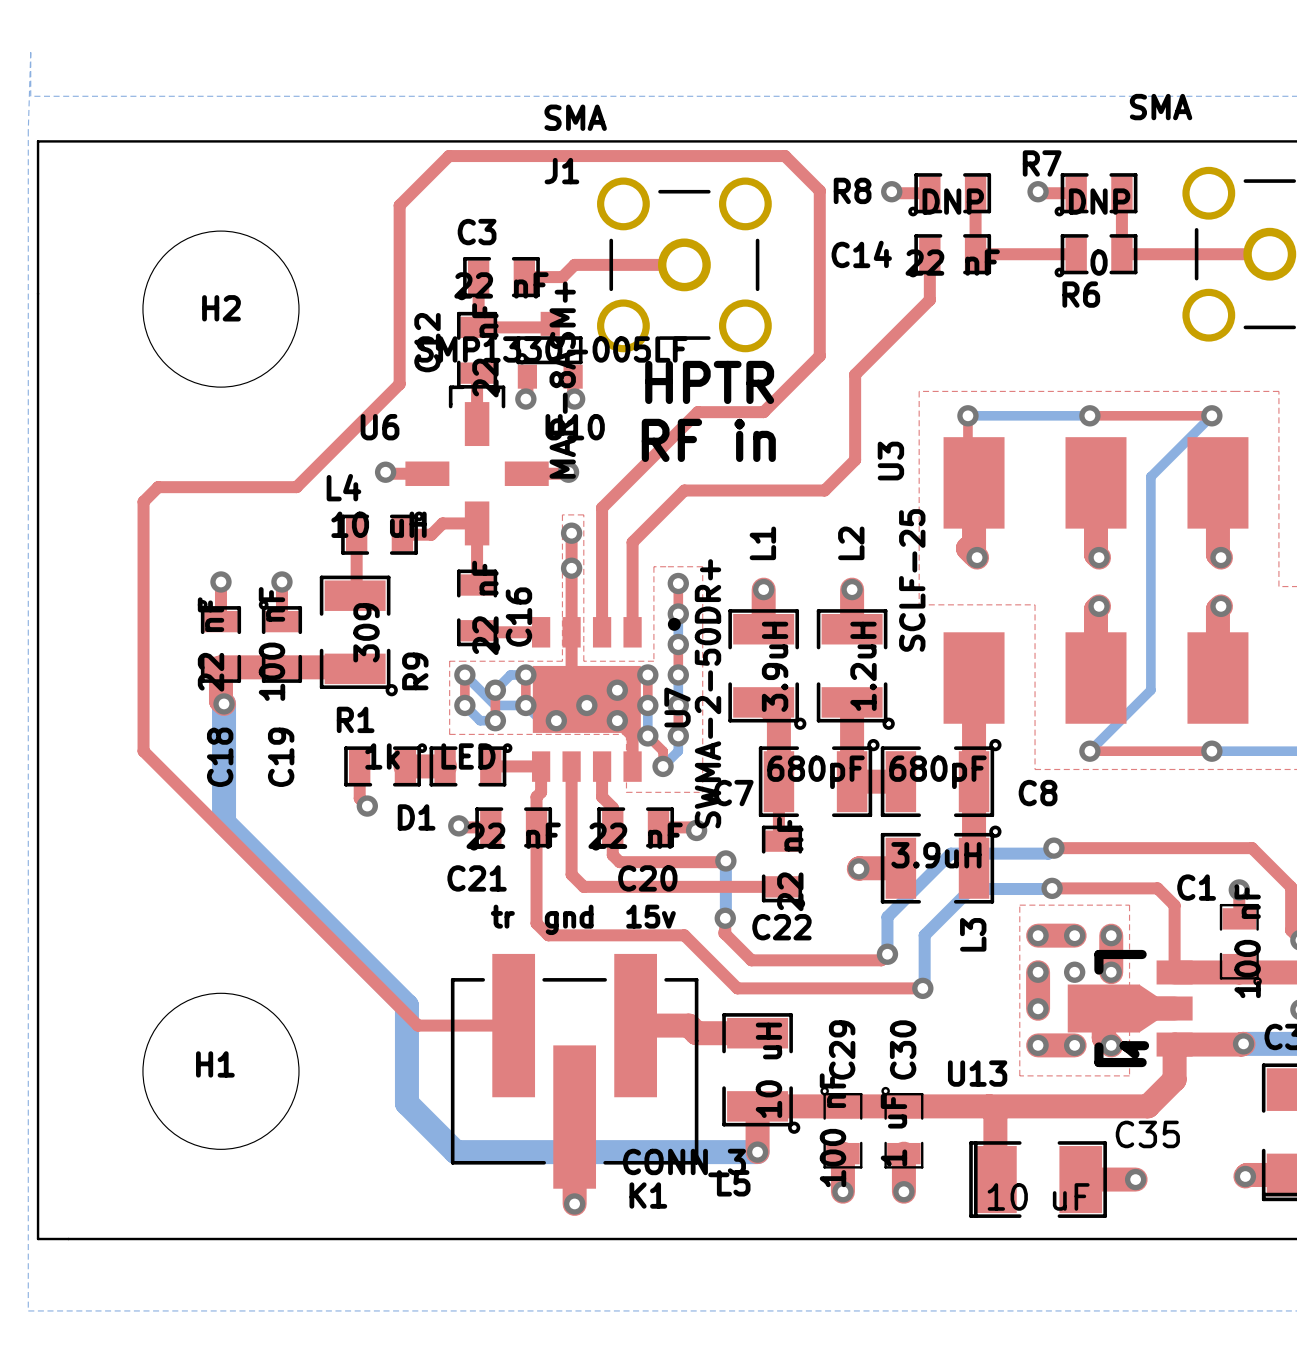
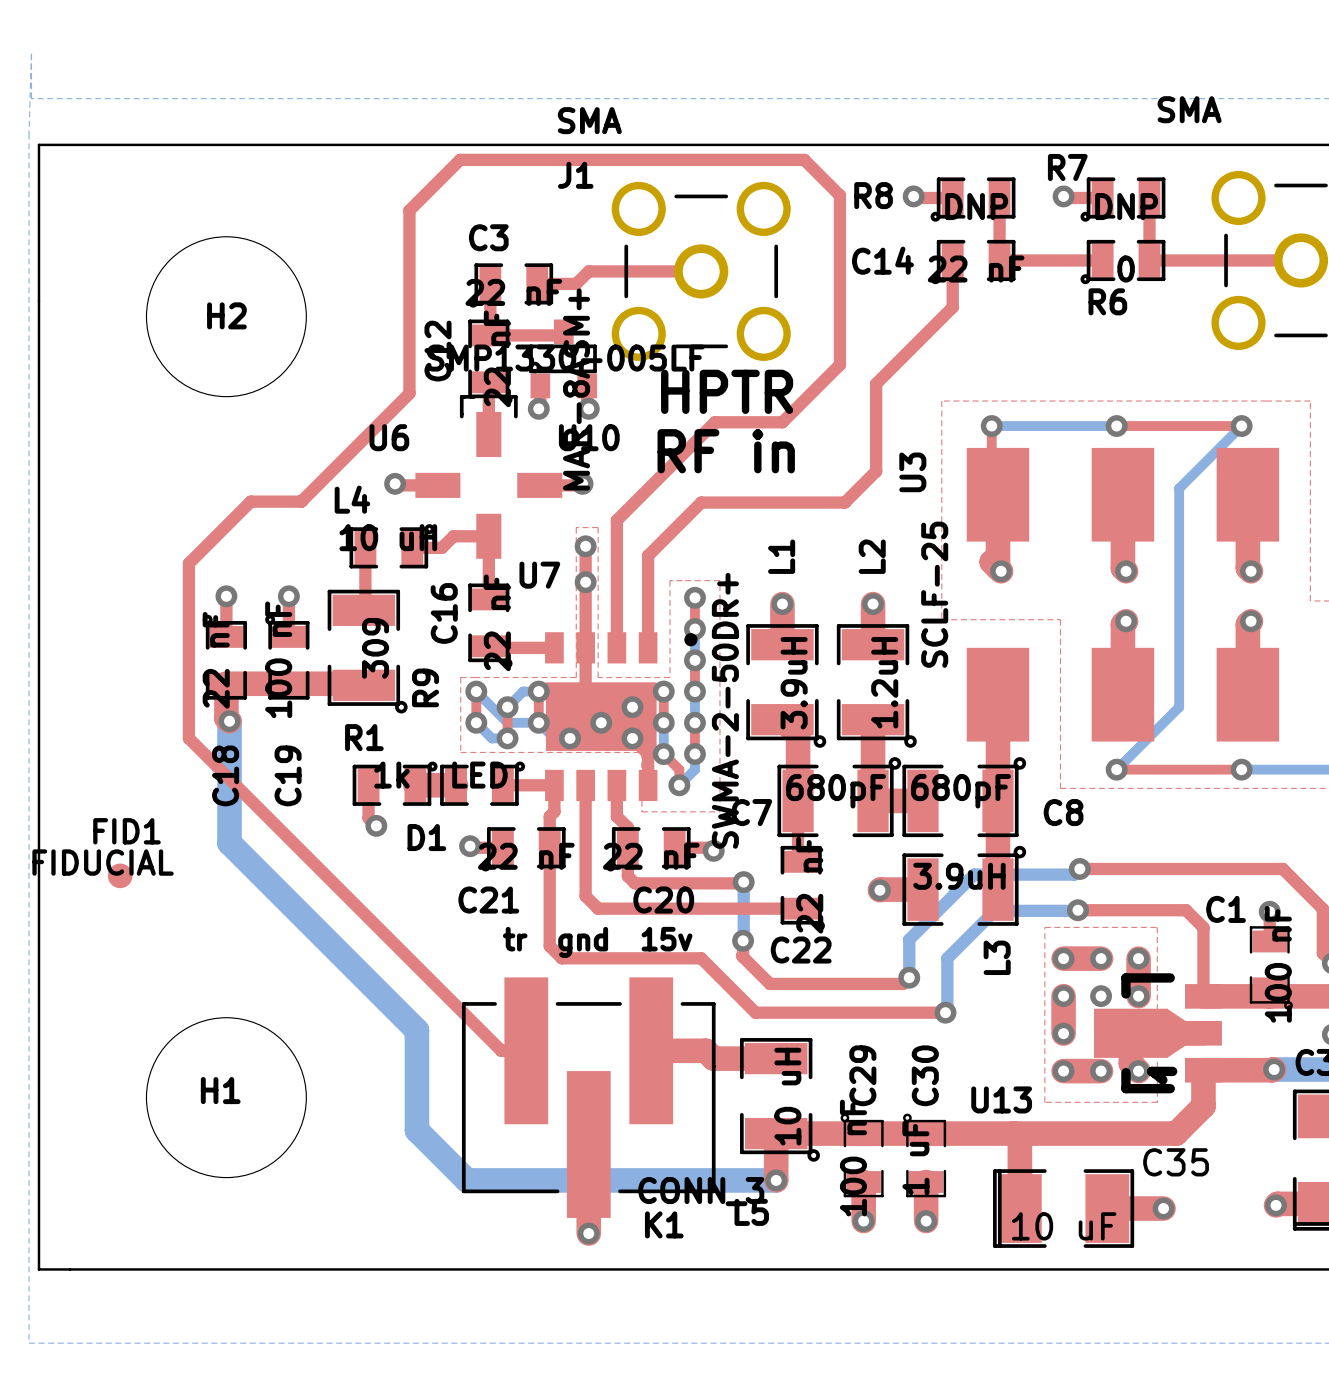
top track: (296, 487) (158, 487) (143, 501) (143, 751) (417, 1025) (489, 1025) -> (303, 499) (301, 501) (250, 501) (188, 563) (188, 738) (501, 1050)
C16 name position: C16 (518, 617) -> C16 (444, 613)
U7 name rotation: 0° (677, 707) -> 90° clockwise (539, 575)
U7 name position: U7 (677, 707) -> U7 (539, 575)
FID1: none -> FIDUCIAL (120, 875)

